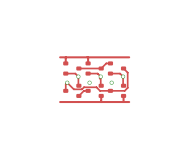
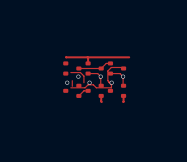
top track: (60, 57) (65, 57) (65, 63) -> none
top track: none -> (125, 67) (111, 67) (107, 70) (107, 80) (111, 87) (96, 87) (93, 84) (88, 84) (85, 87) (70, 87)
top track: (123, 68) (127, 72) (127, 87) (124, 90) (100, 90) (96, 87) (73, 89) (67, 82) (65, 90) -> none
top track: none -> (70, 72) (80, 72) (83, 76) (83, 82)
top track: (65, 73) (75, 73) (78, 76) (78, 85) -> none
top track: none -> (72, 80) (72, 86)
top track: (129, 102) (60, 102) -> none

